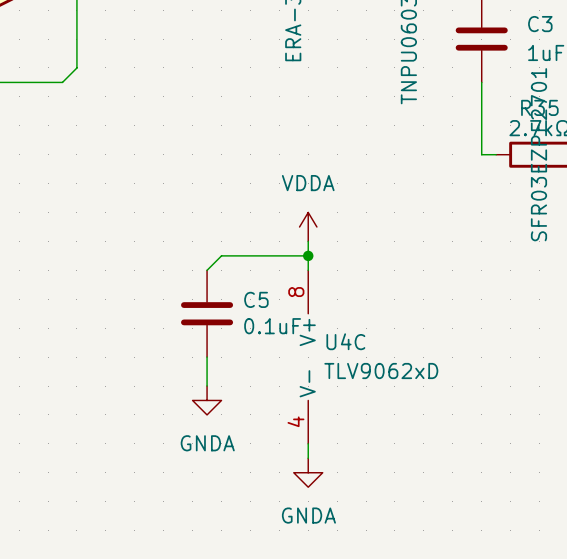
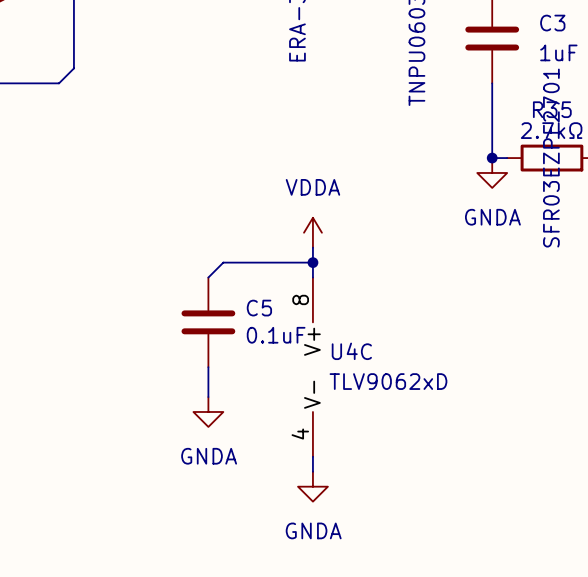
junction: none -> (492, 158)
power symbol: none -> GNDA (492, 172)

